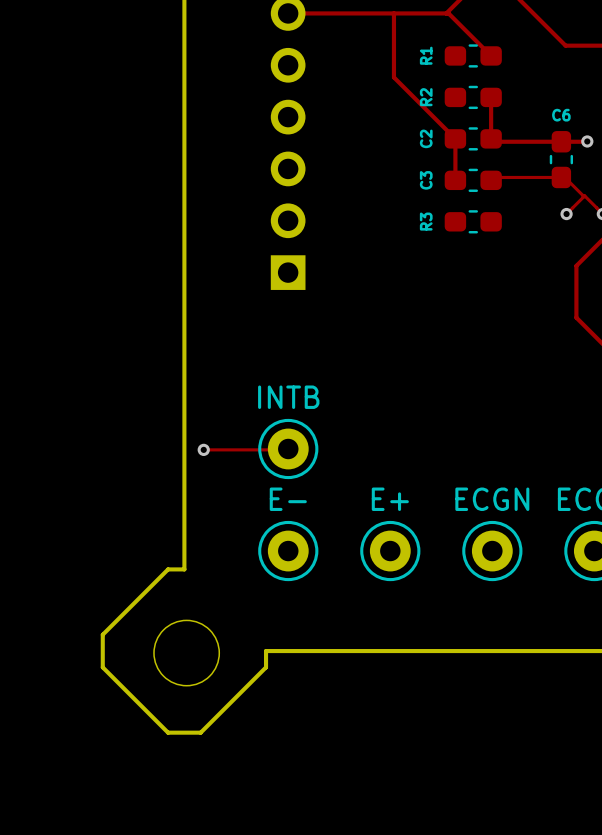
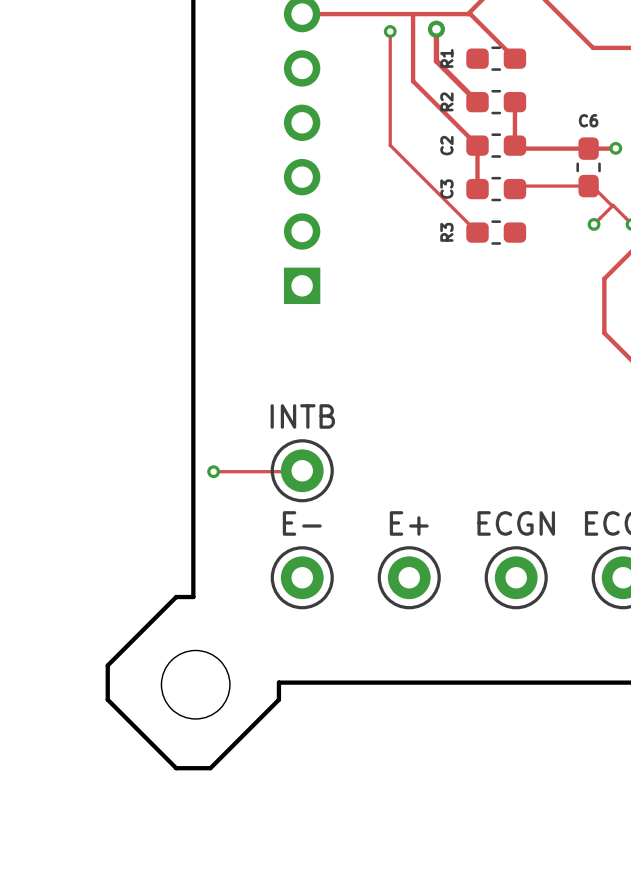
track: none -> (436, 29) (436, 61) (477, 102)
via: none -> (436, 29)
track: none -> (390, 31) (390, 145) (477, 232)
via: none -> (390, 31)

